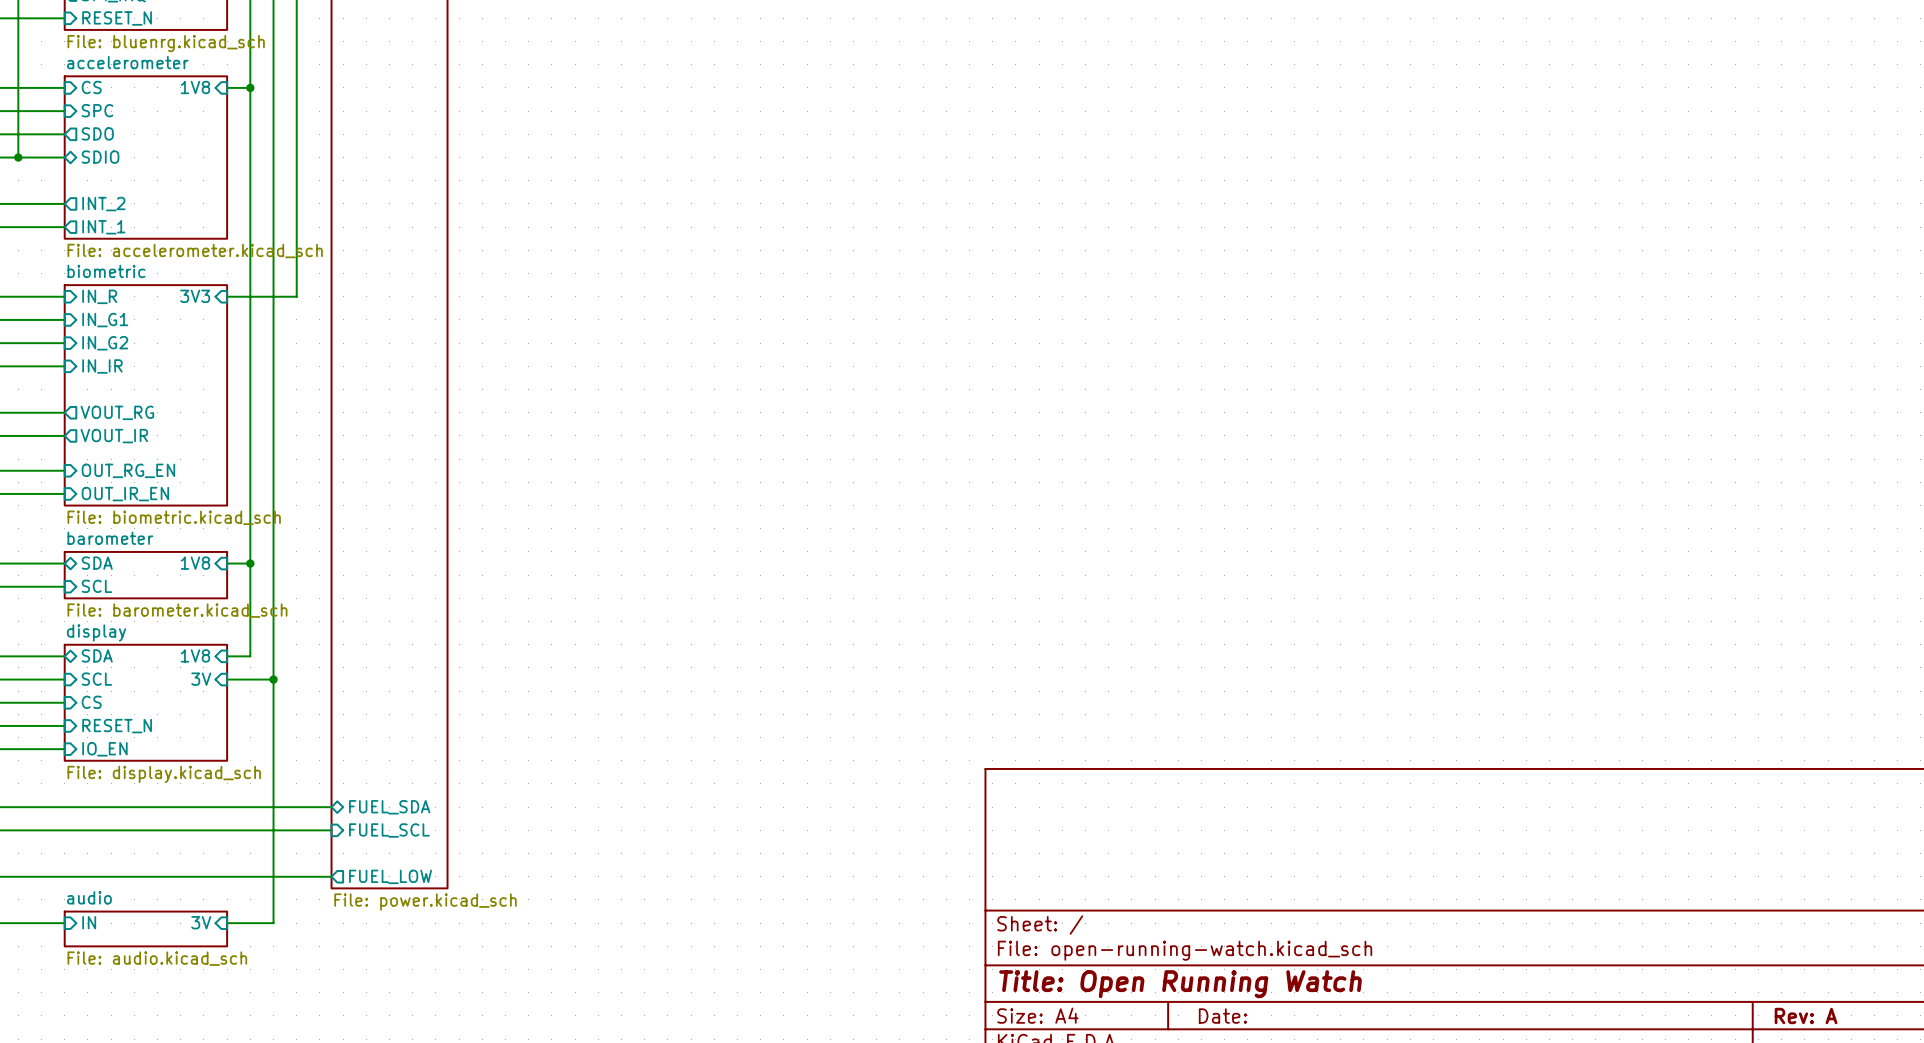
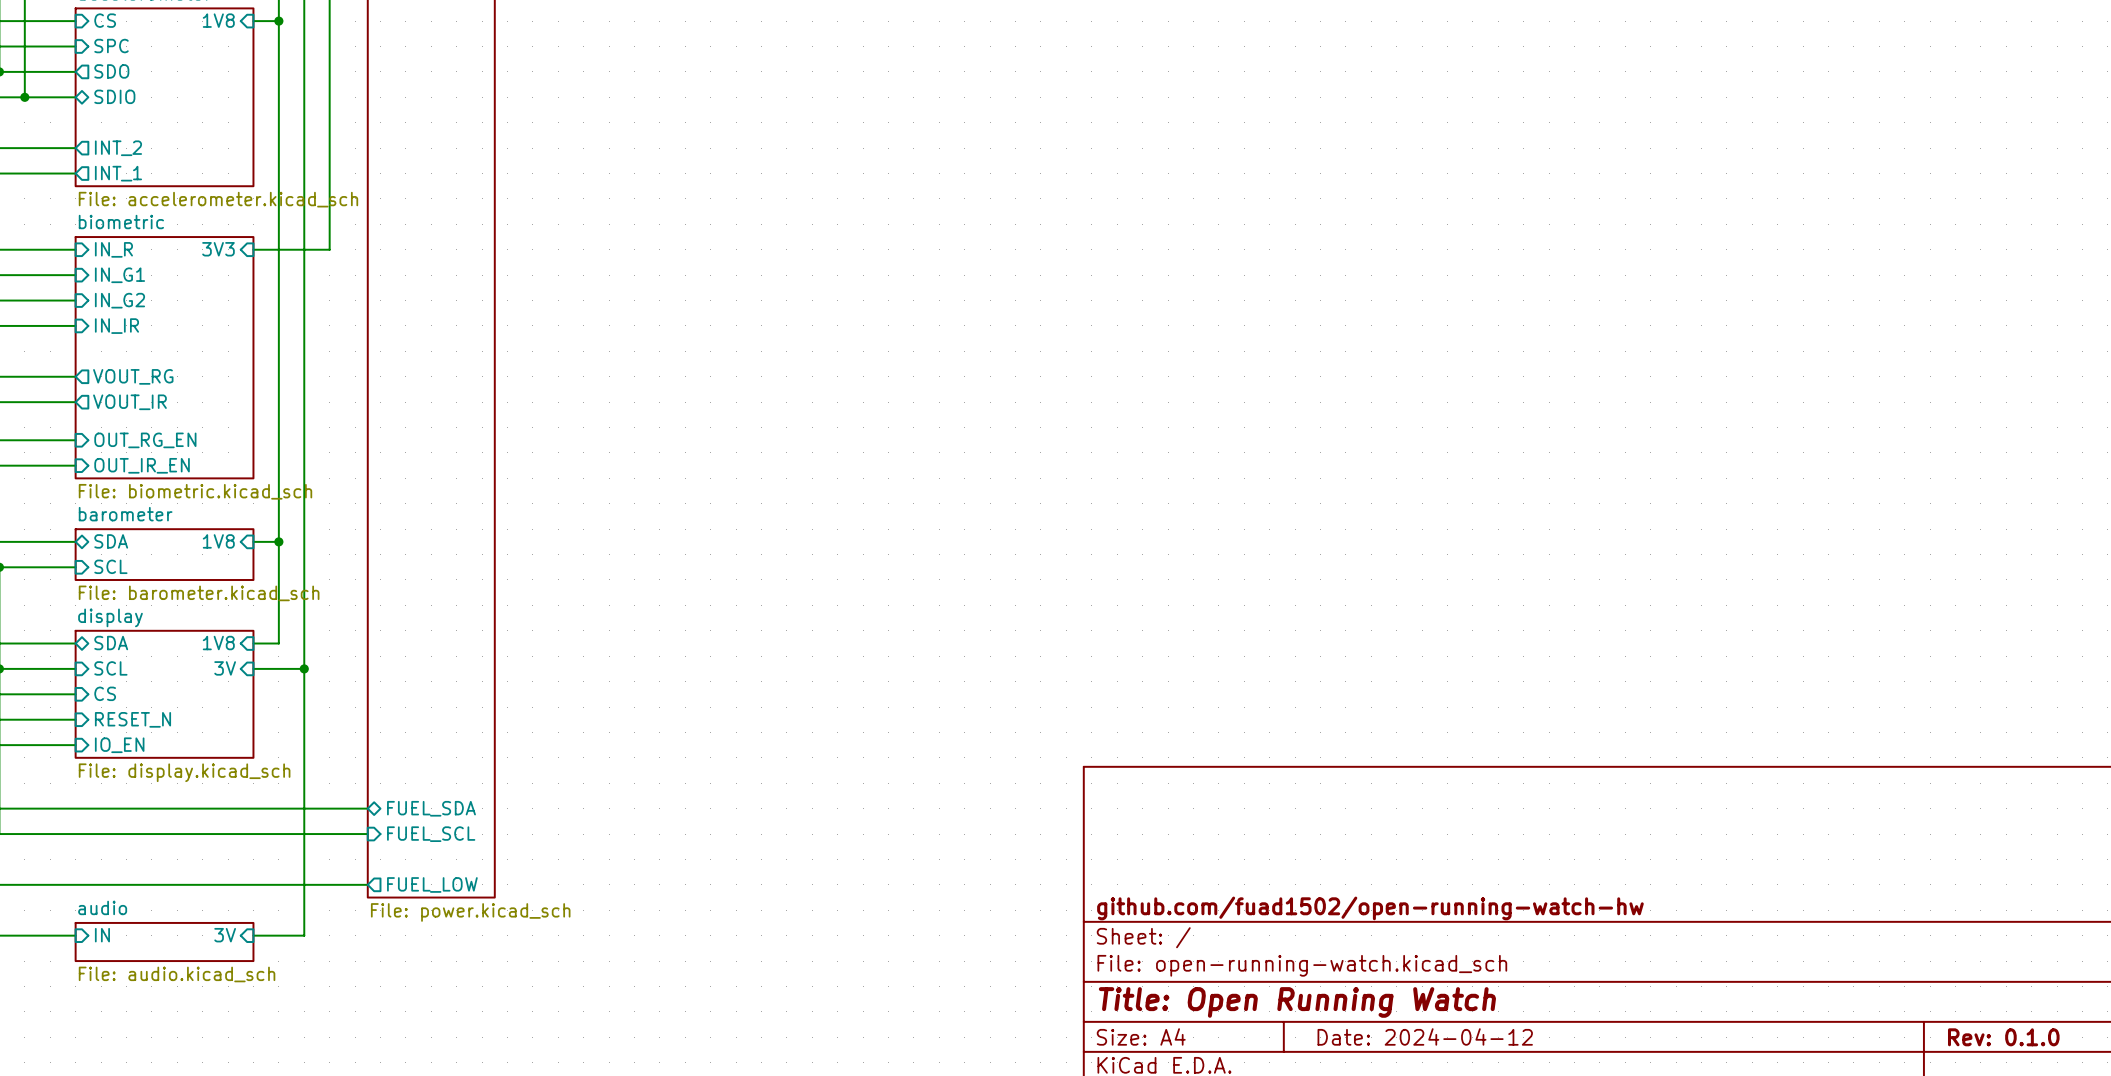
title block: none -> github.com/fuad1502/open-running-watch-hw (1370, 908)
title block: Date: (1222, 1016) -> Date: 2024-04-12 (1425, 1036)
title block: Rev: A (1806, 1016) -> Rev: 0.1.0 (2003, 1037)

